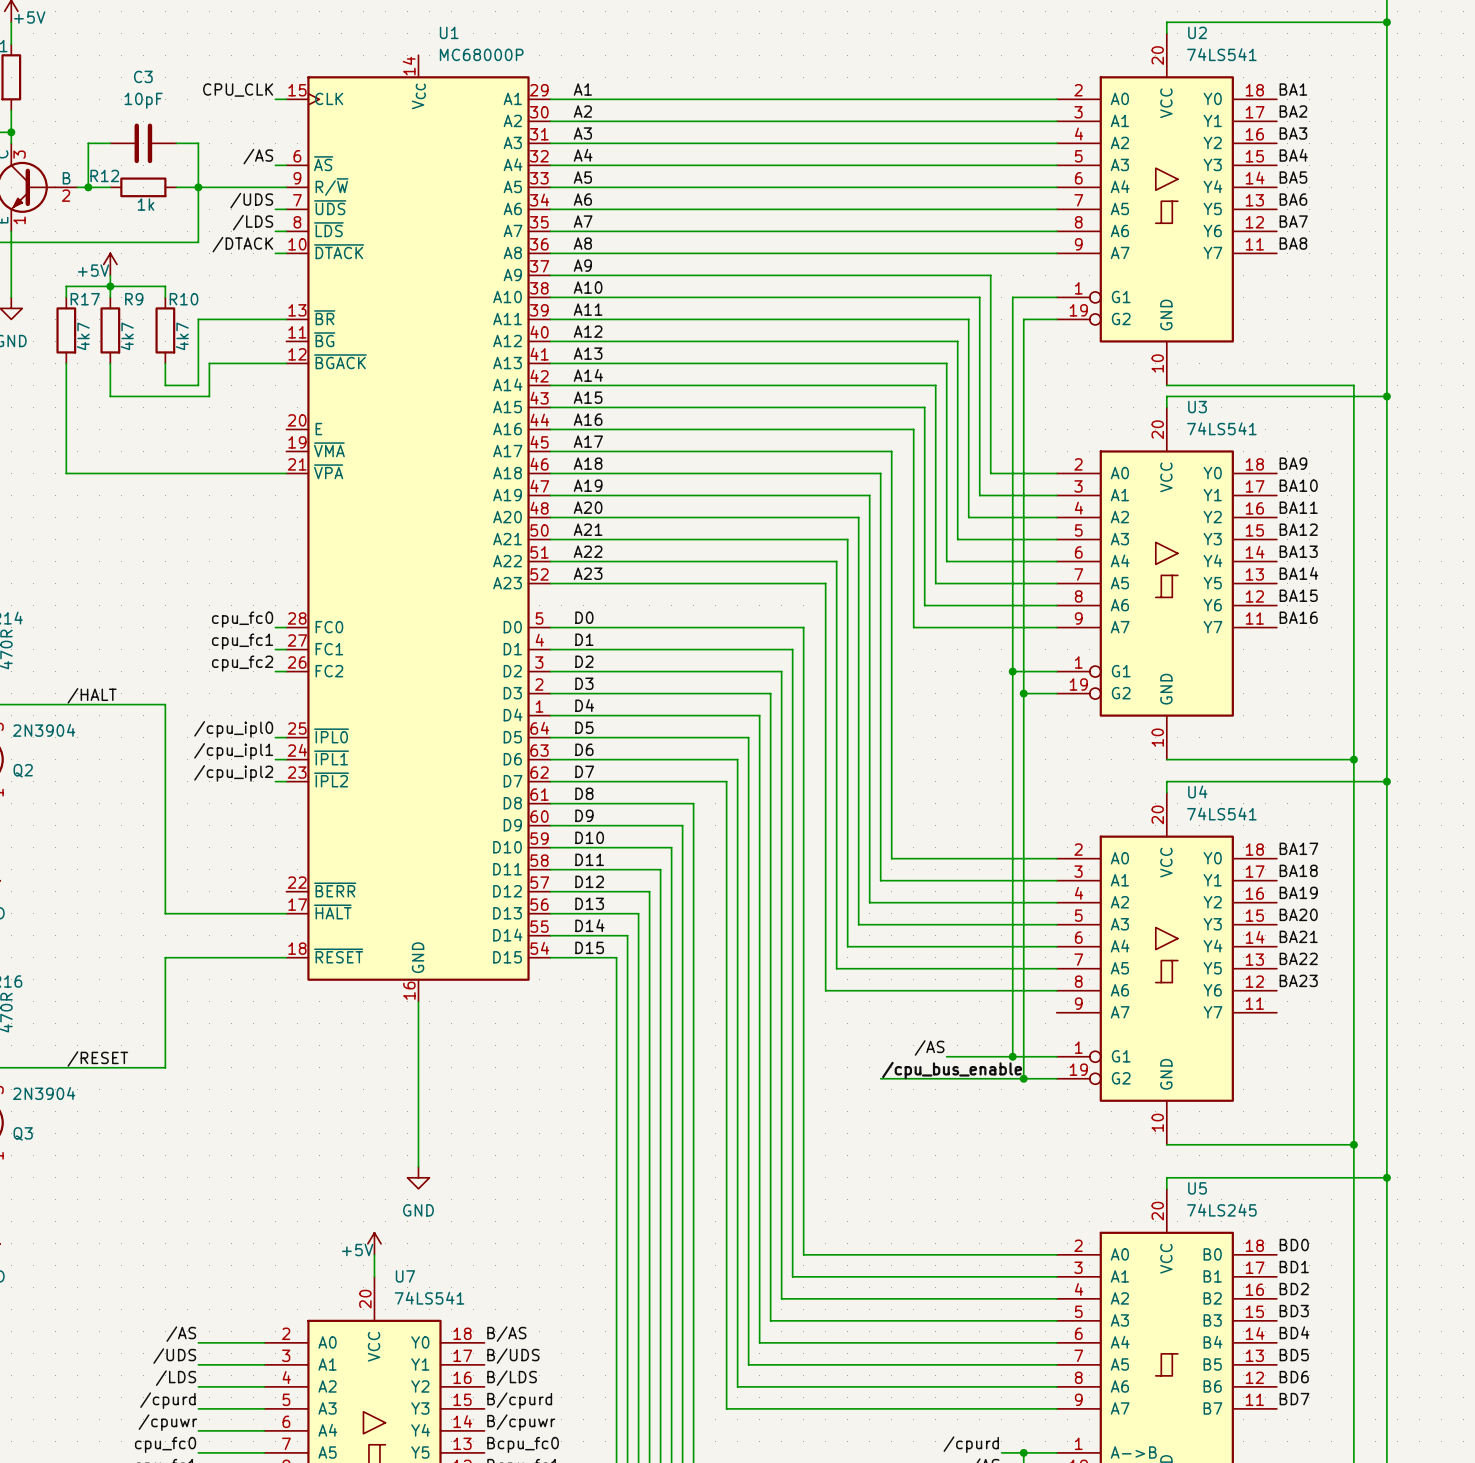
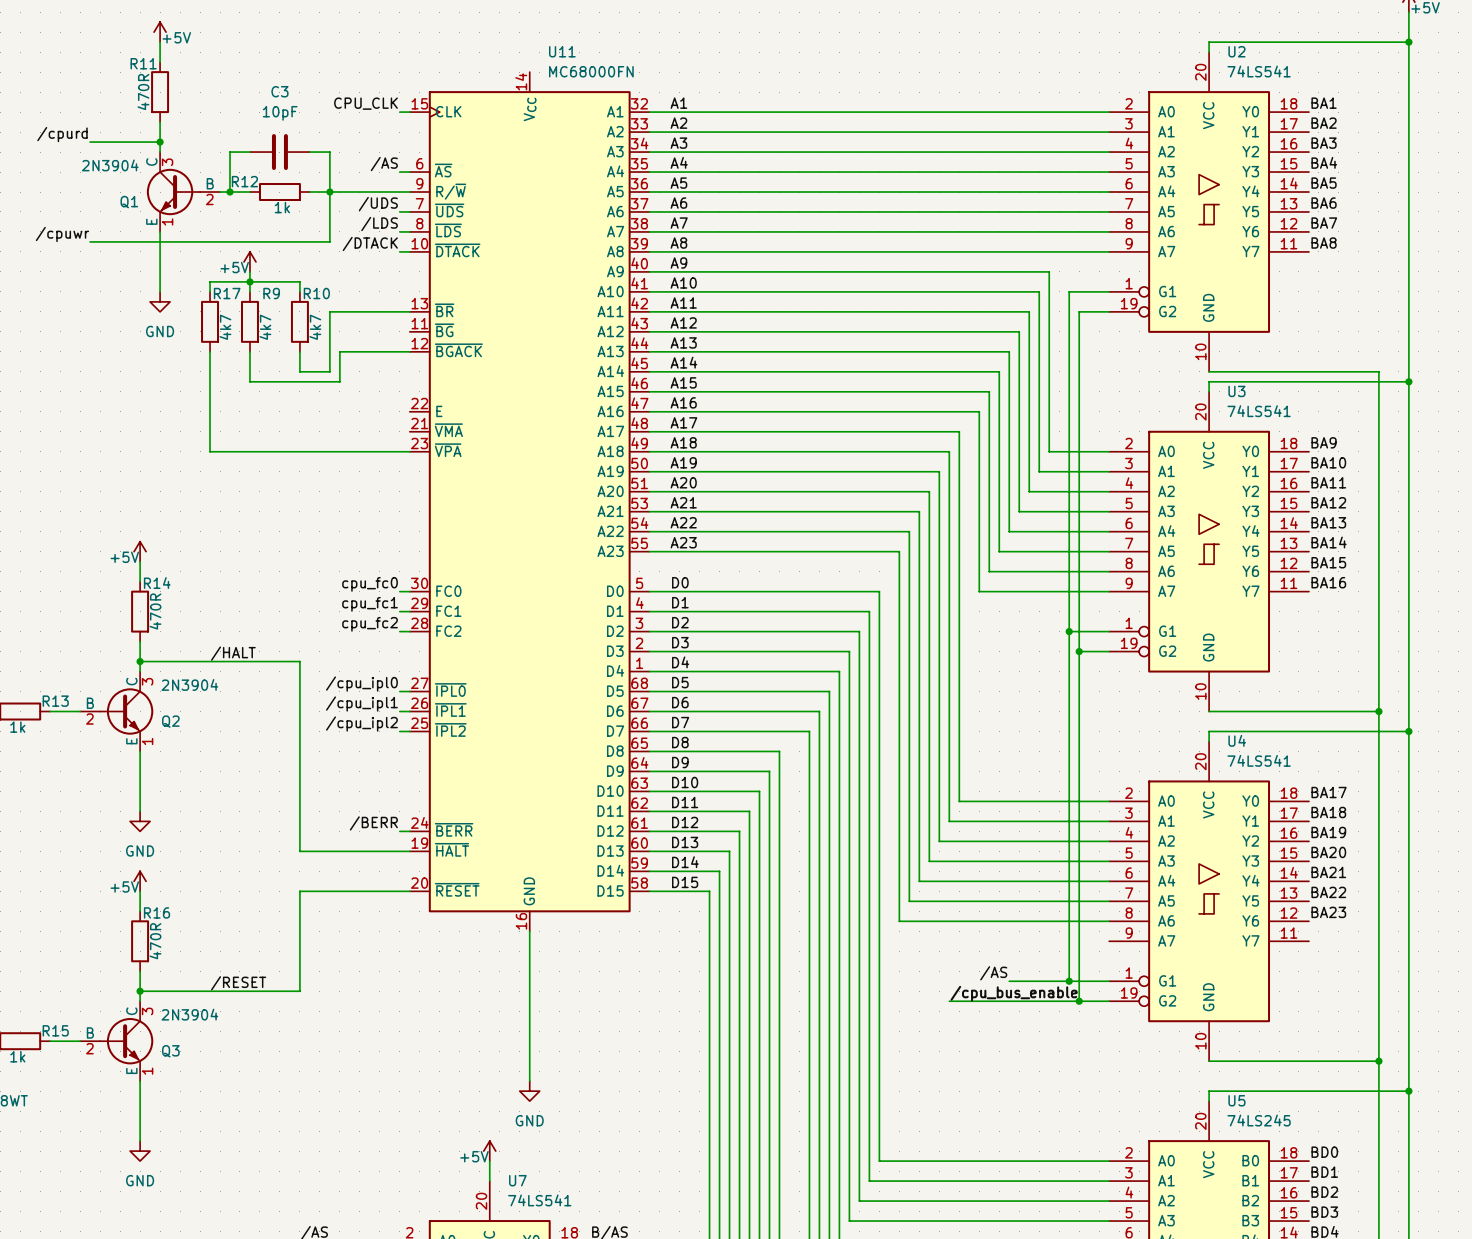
U1 name: U1 (449, 32) -> U11 (562, 51)
U1 value: MC68000P (481, 54) -> MC68000FN (591, 71)
U1 symbol: [286, 55, 551, 1002] -> [409, 72, 650, 932]
label: none -> /BERR (373, 823)
wire: none -> (399, 831) (409, 831)

